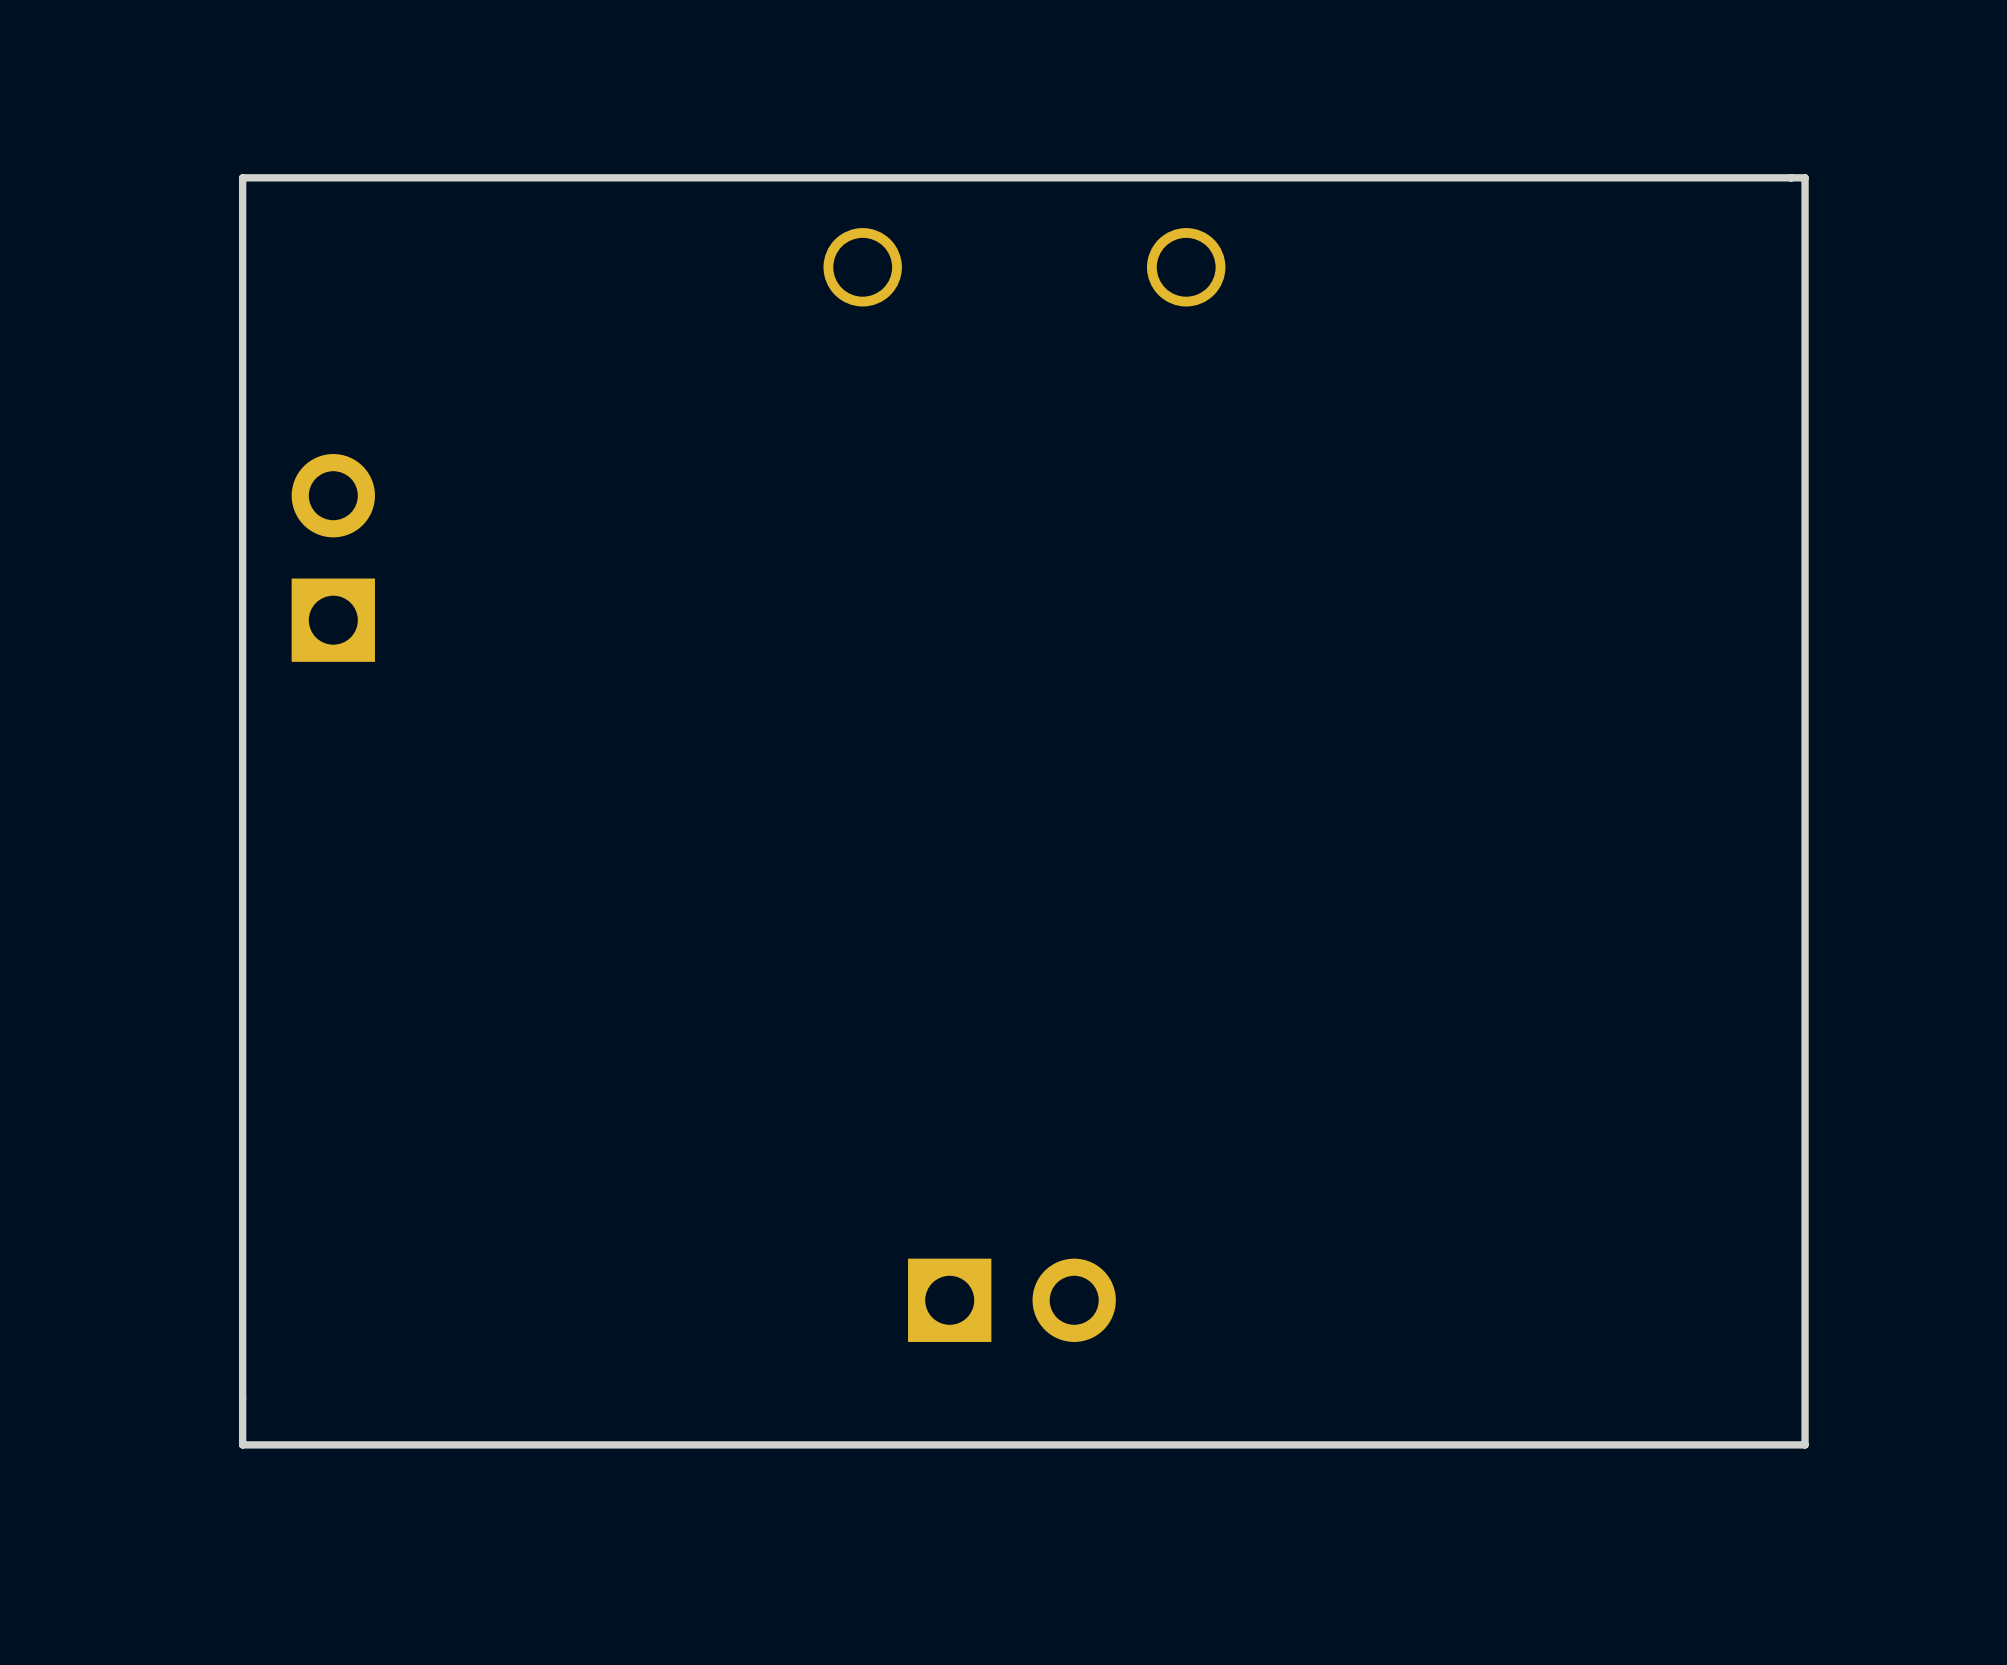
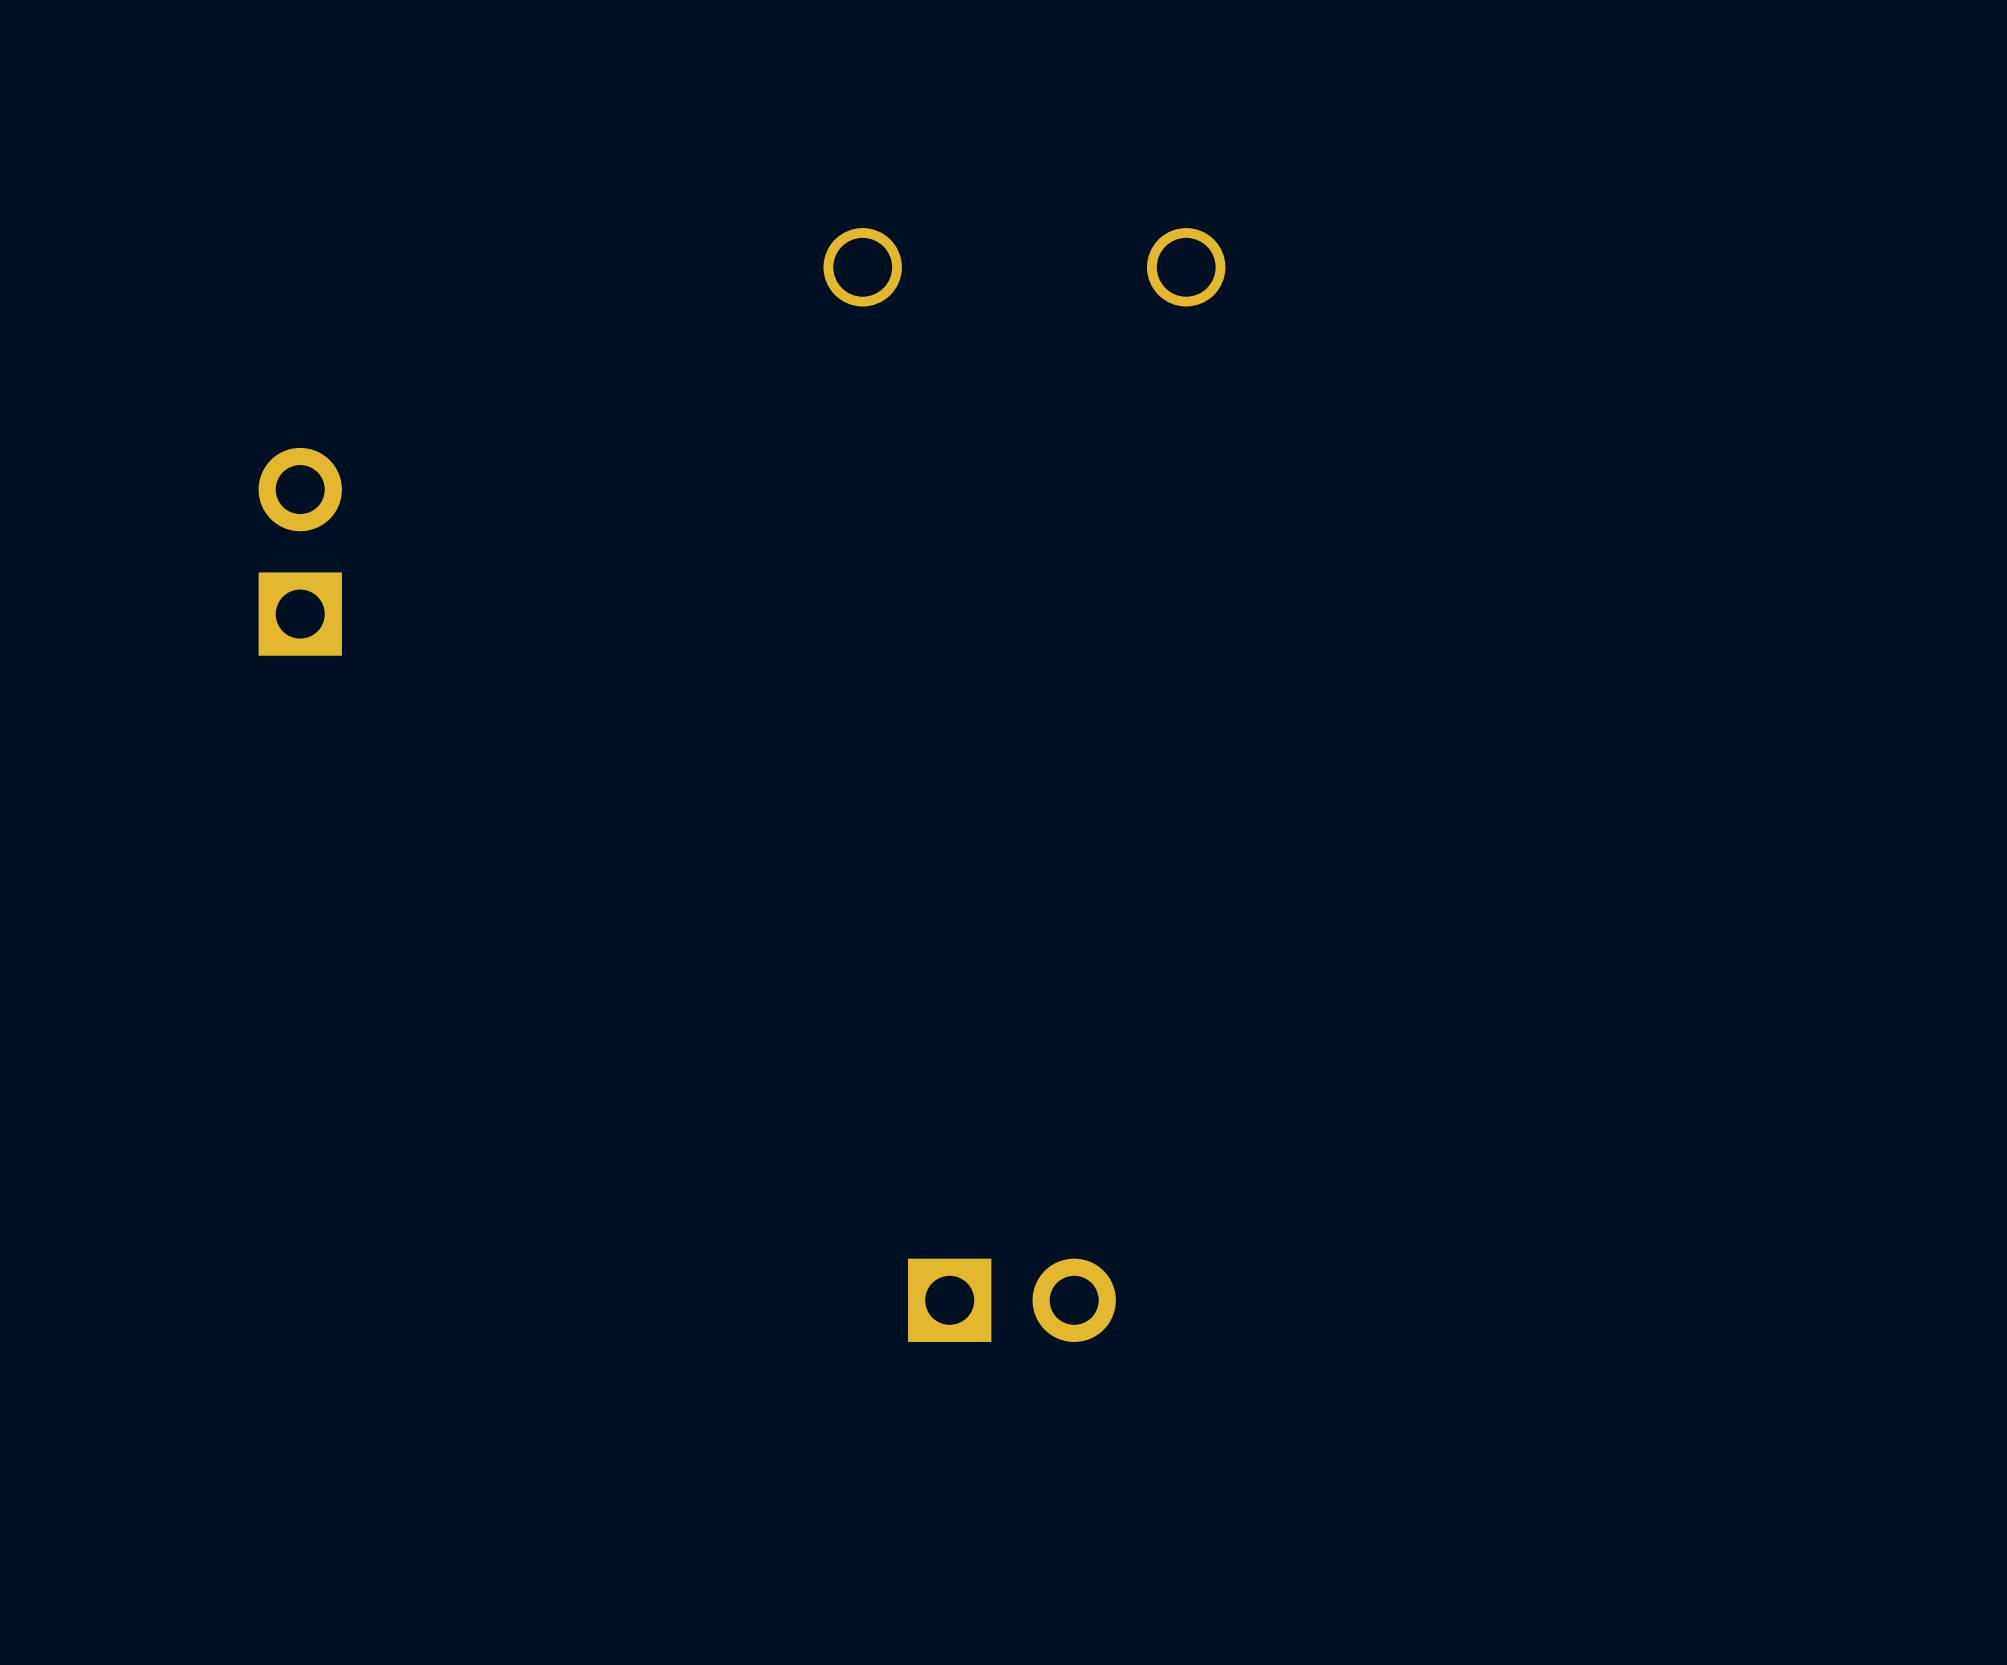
board edge: (1805, 177) (242, 177) (242, 1444) (1805, 1444) (1805, 177) -> none
part position: (333, 557) -> (300, 551)

